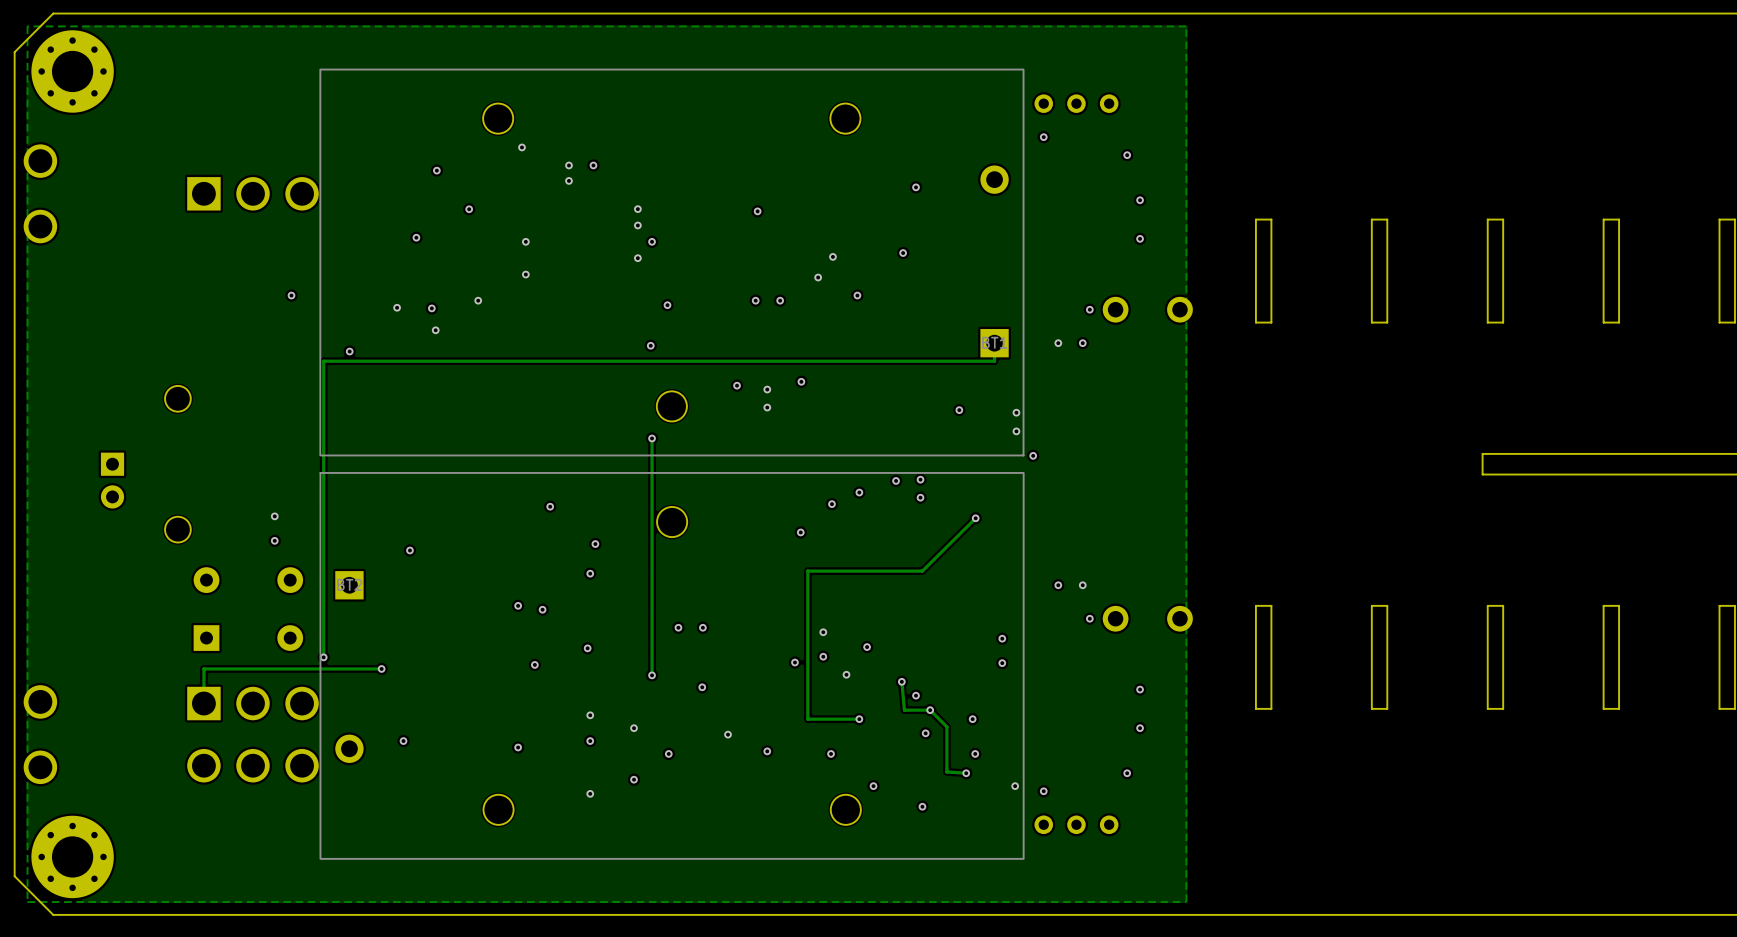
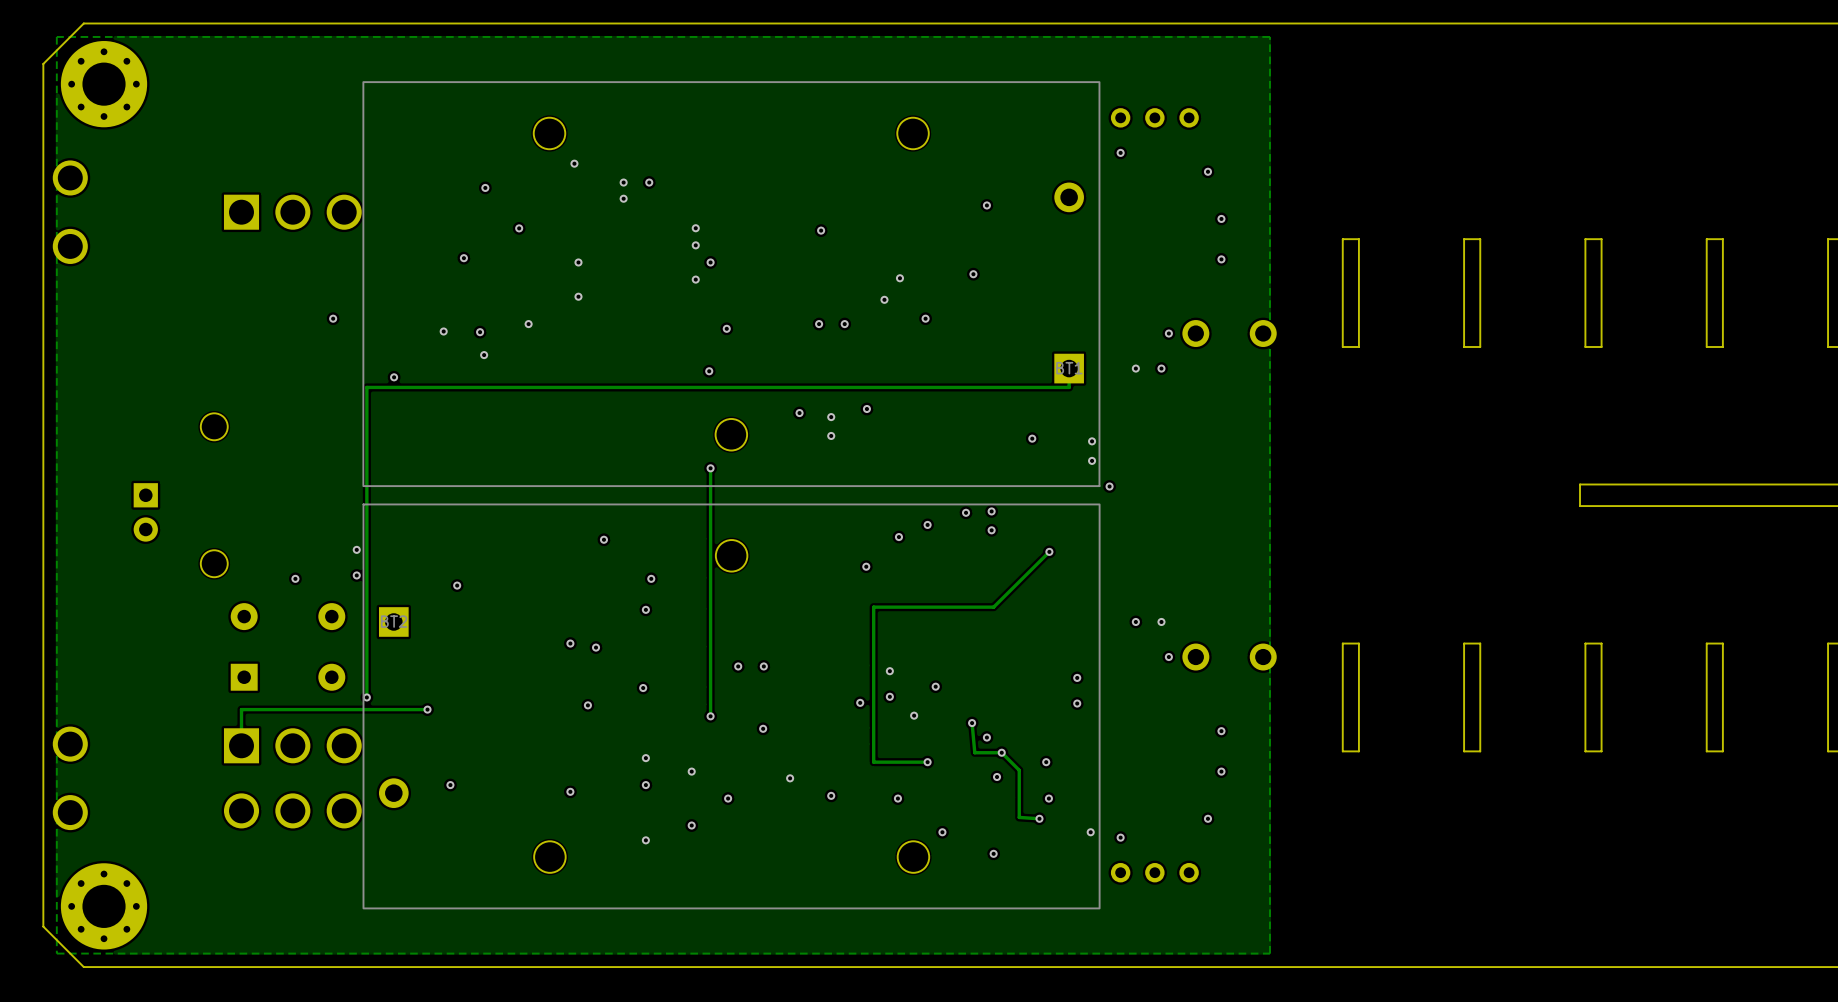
via: (274, 516) -> none
via: none -> (356, 549)
via: (274, 540) -> none
via: none -> (356, 575)
via: none -> (295, 578)

